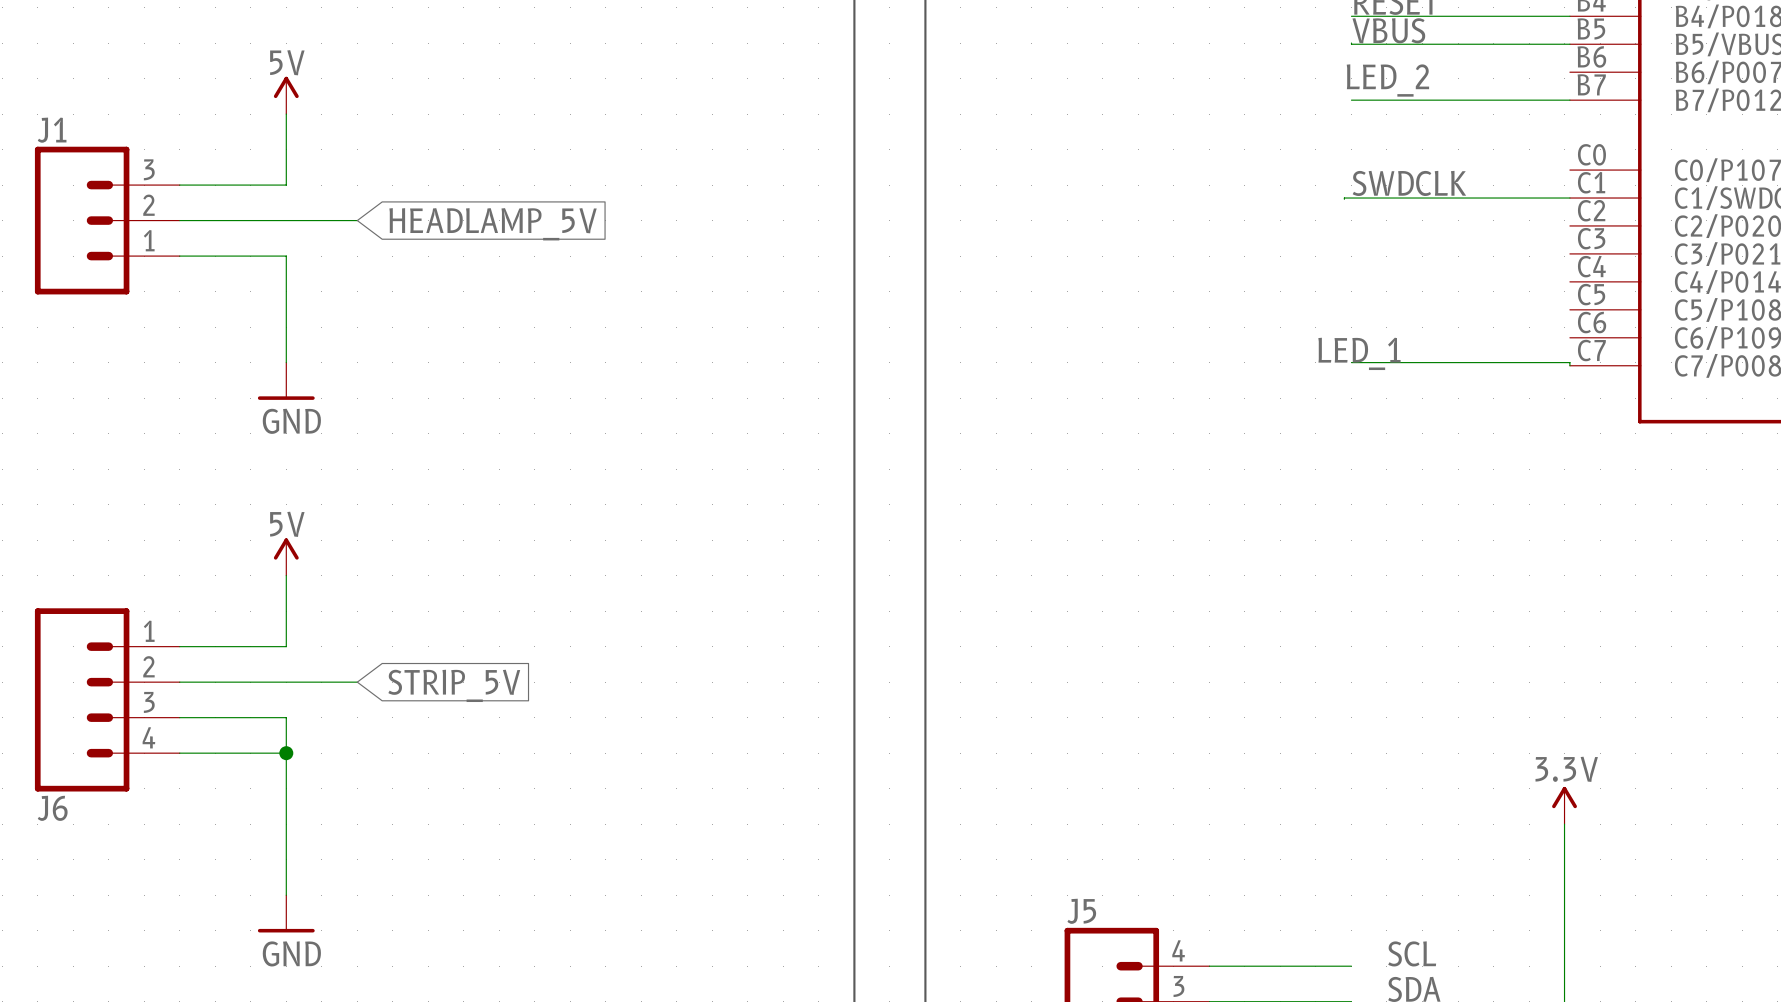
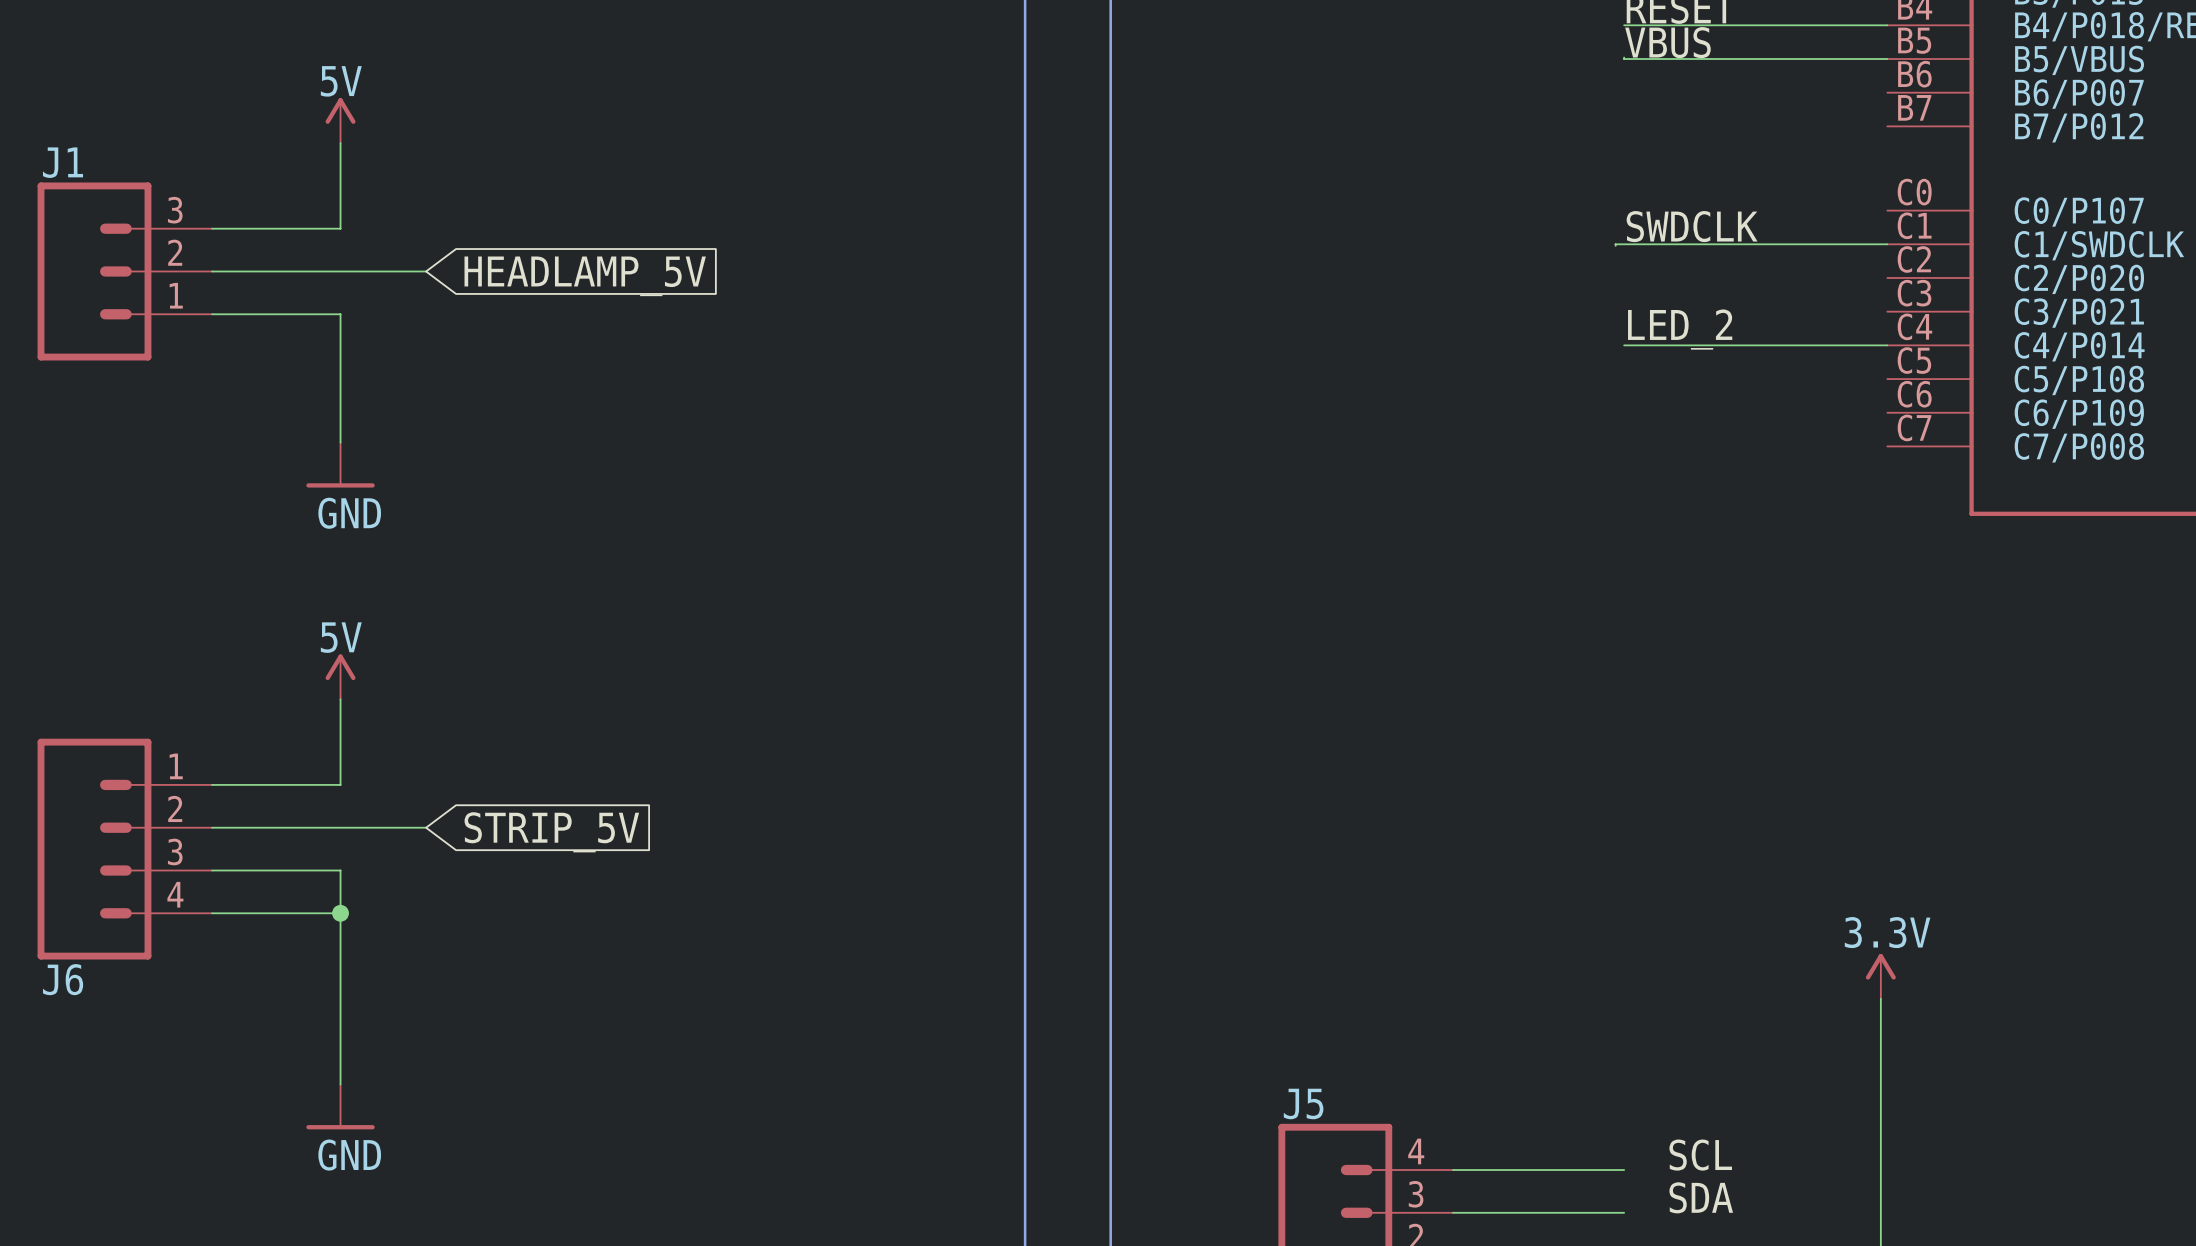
label position: LED_2 (1387, 80) -> LED_2 (1680, 329)
wire: (1351, 100) (1569, 100) -> (1624, 345) (1887, 345)
label: LED_1 (1359, 353) -> none
wire: (1351, 362) (1569, 362) (1569, 365) -> none

